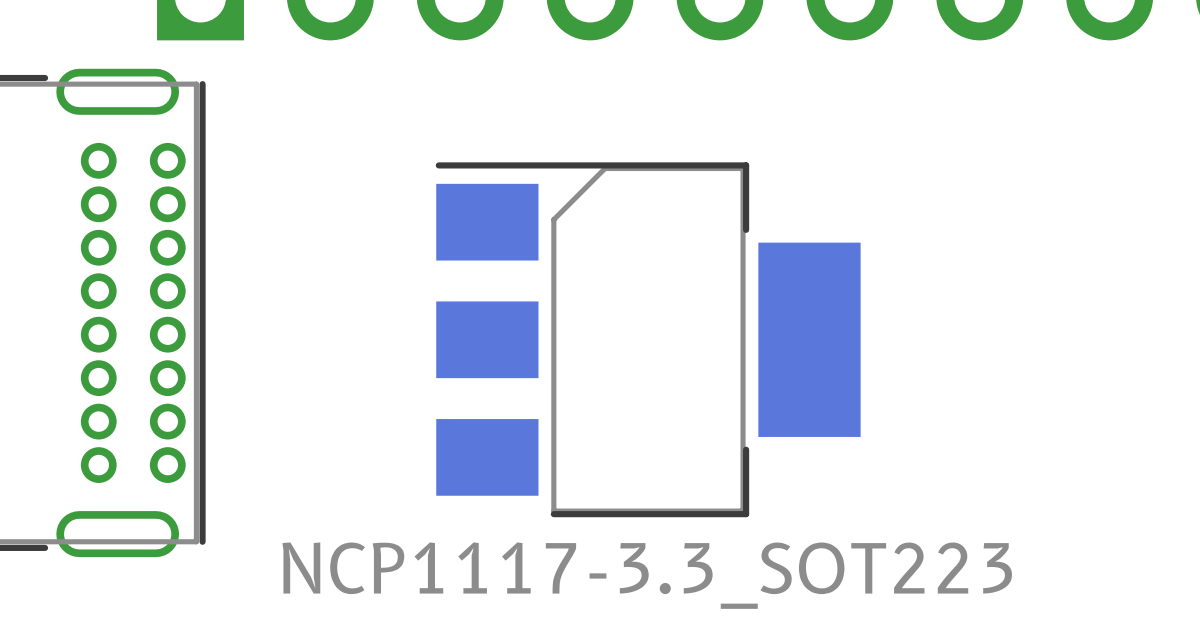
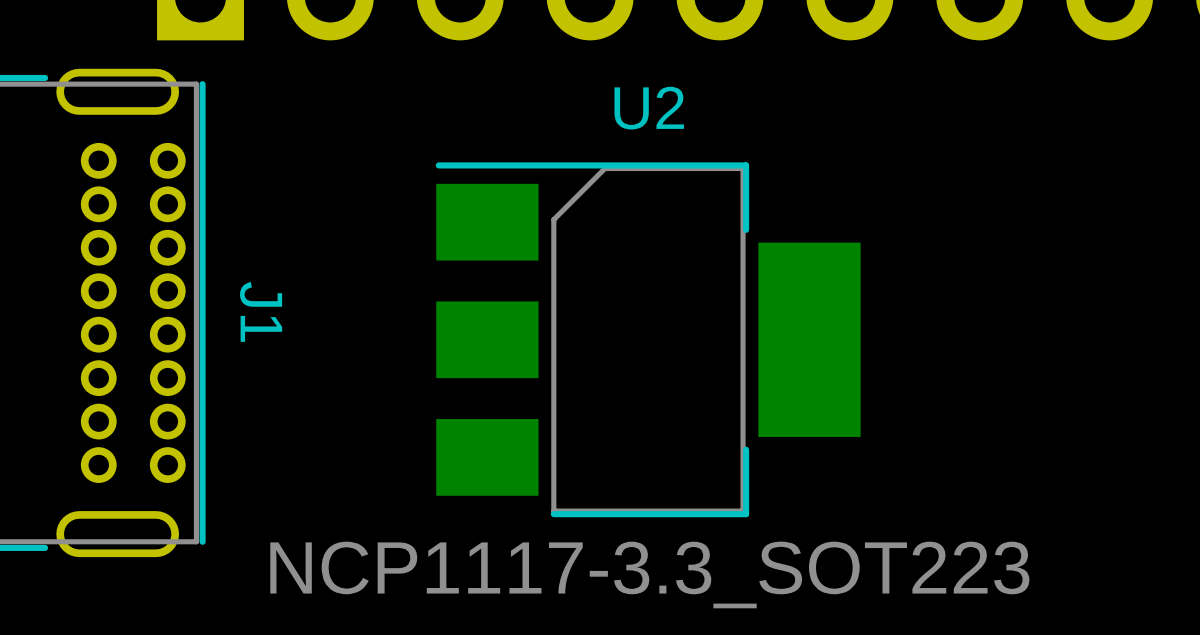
U2 name: none -> U2 (649, 108)
J1 name: none -> J1 (261, 311)

